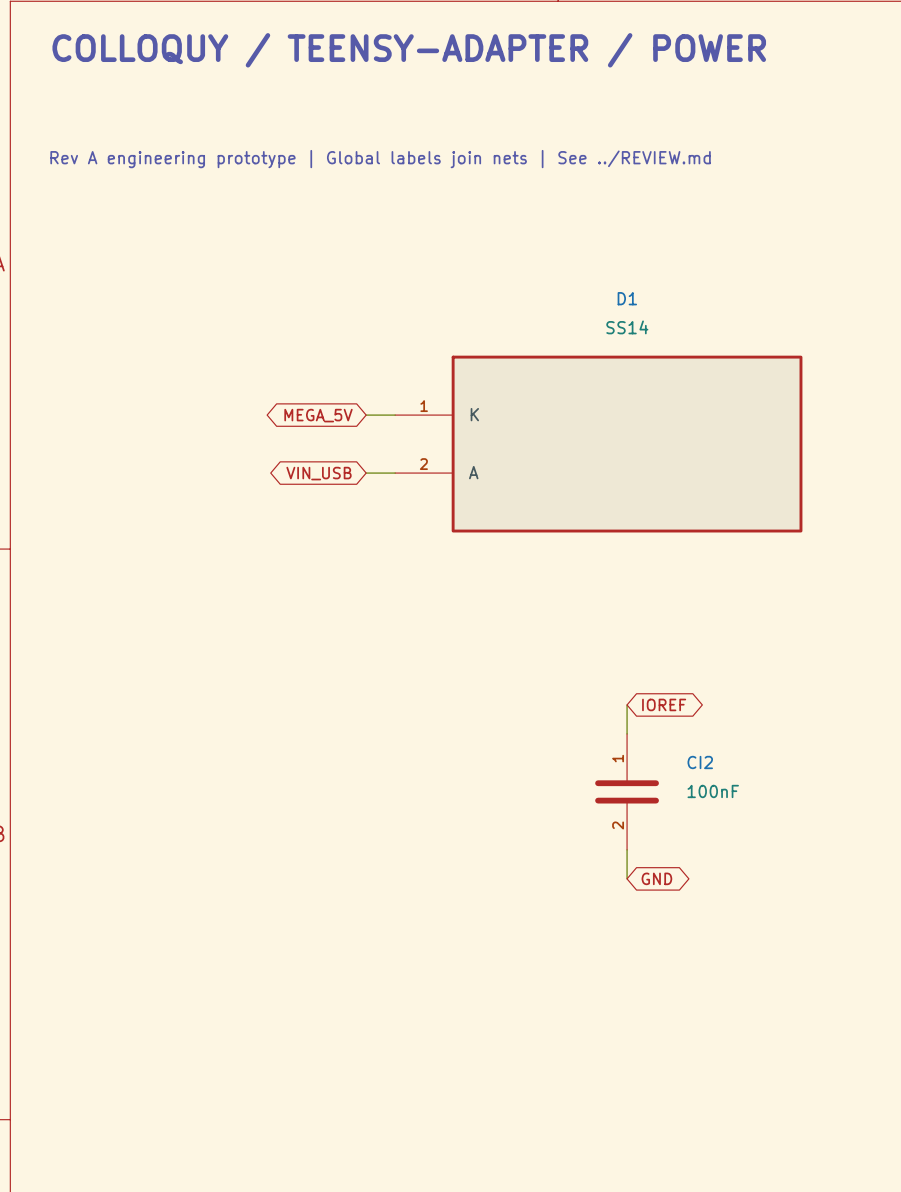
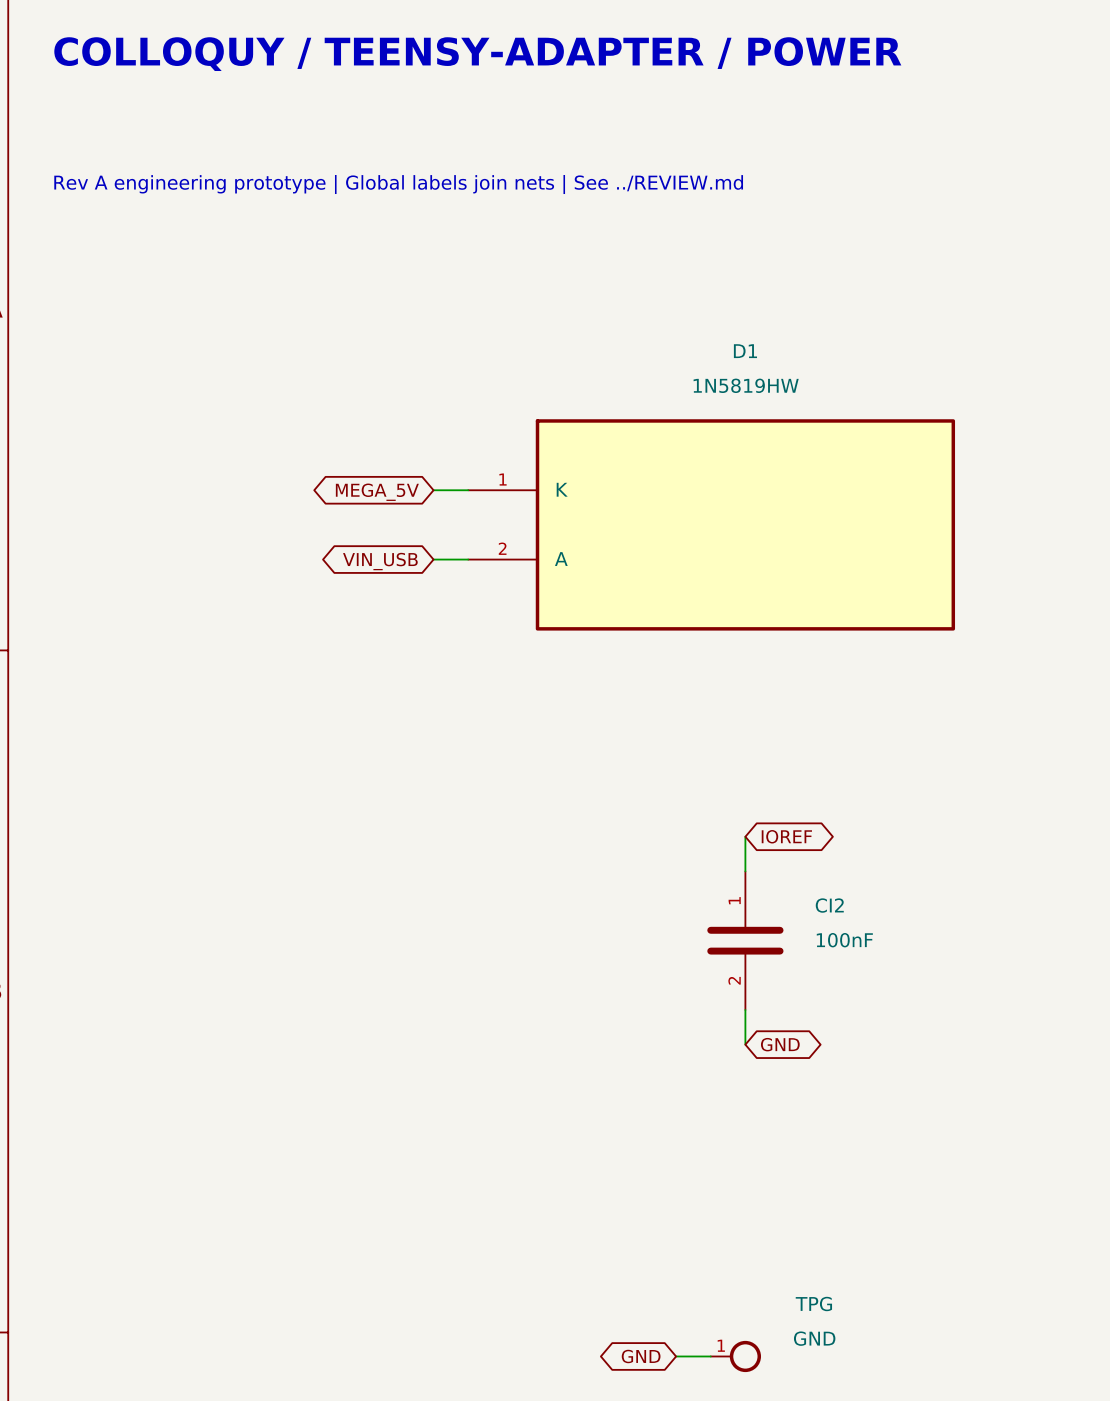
D1 value: SS14 (627, 327) -> 1N5819HW (746, 385)
global label: none -> GND (641, 1356)
wire: none -> (676, 1356) (710, 1356)
TPG: none -> GND (735, 1356)

